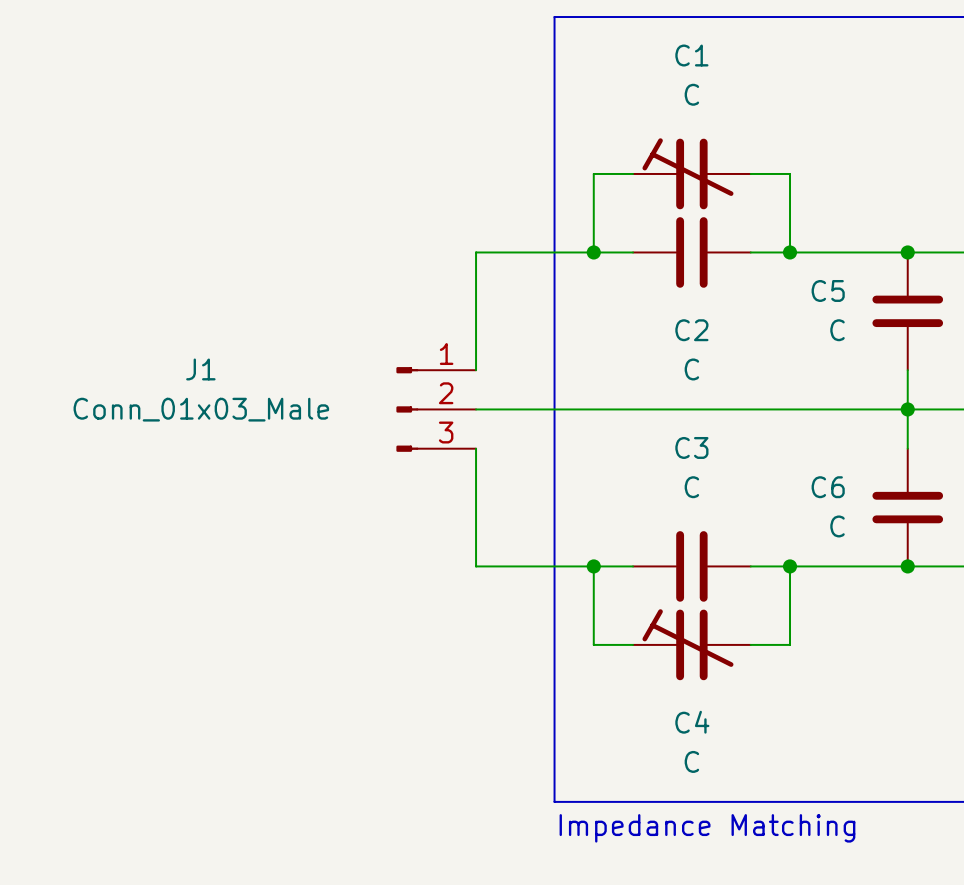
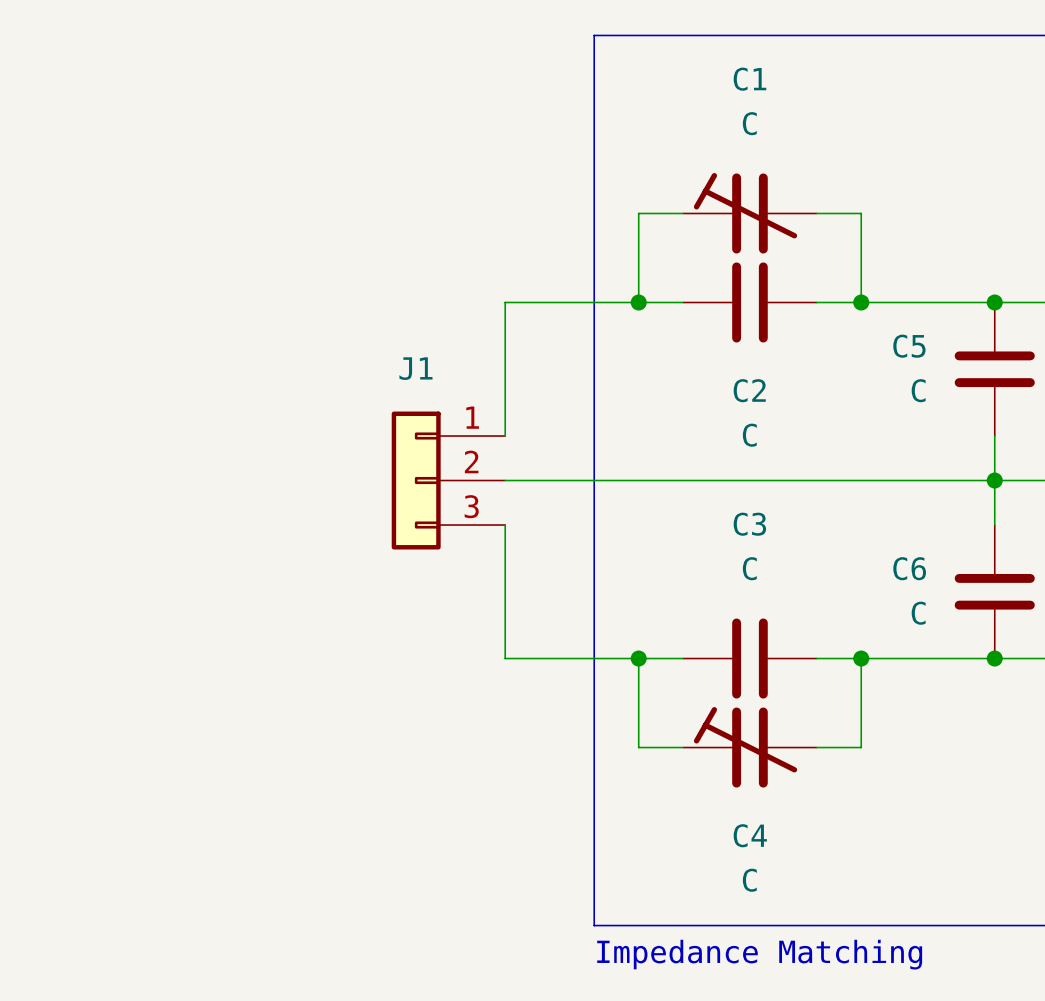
J1 symbol: [396, 367, 477, 452] -> [391, 411, 506, 550]
J1 name position: J1 (200, 369) -> J1 (415, 368)
J1 value: Conn_01x03_Male (201, 409) -> none

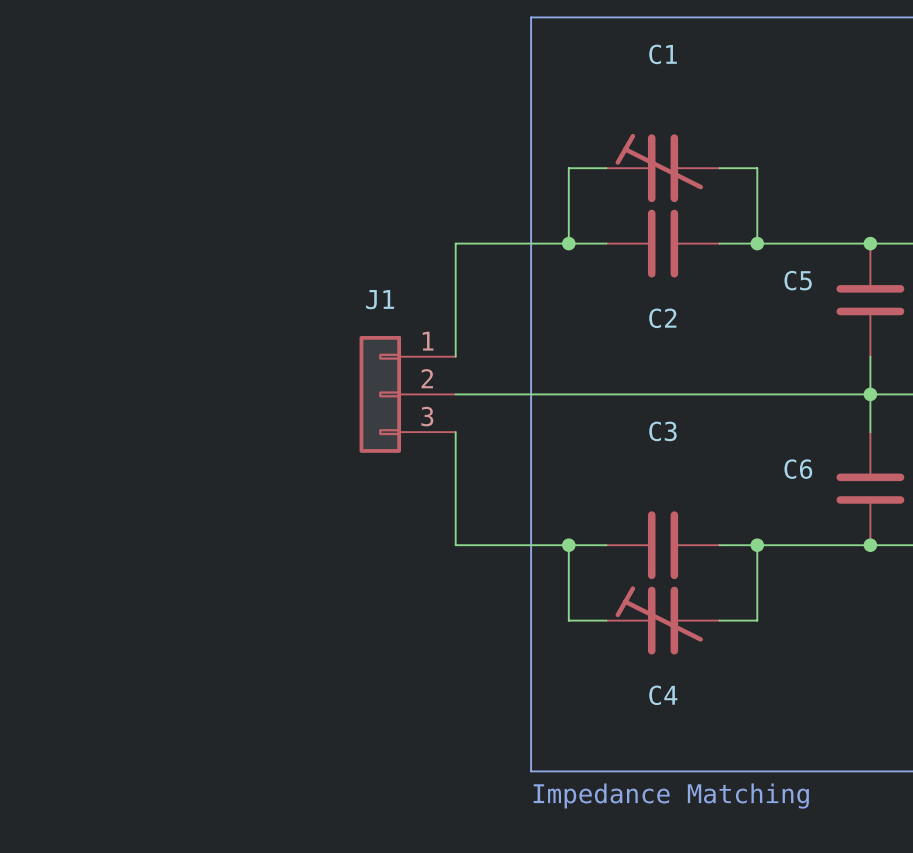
C1 value: C (749, 123) -> none
C5 value: C (918, 390) -> none
C2 value: C (749, 435) -> none
C3 value: C (749, 568) -> none
C6 value: C (918, 613) -> none
C4 value: C (749, 880) -> none

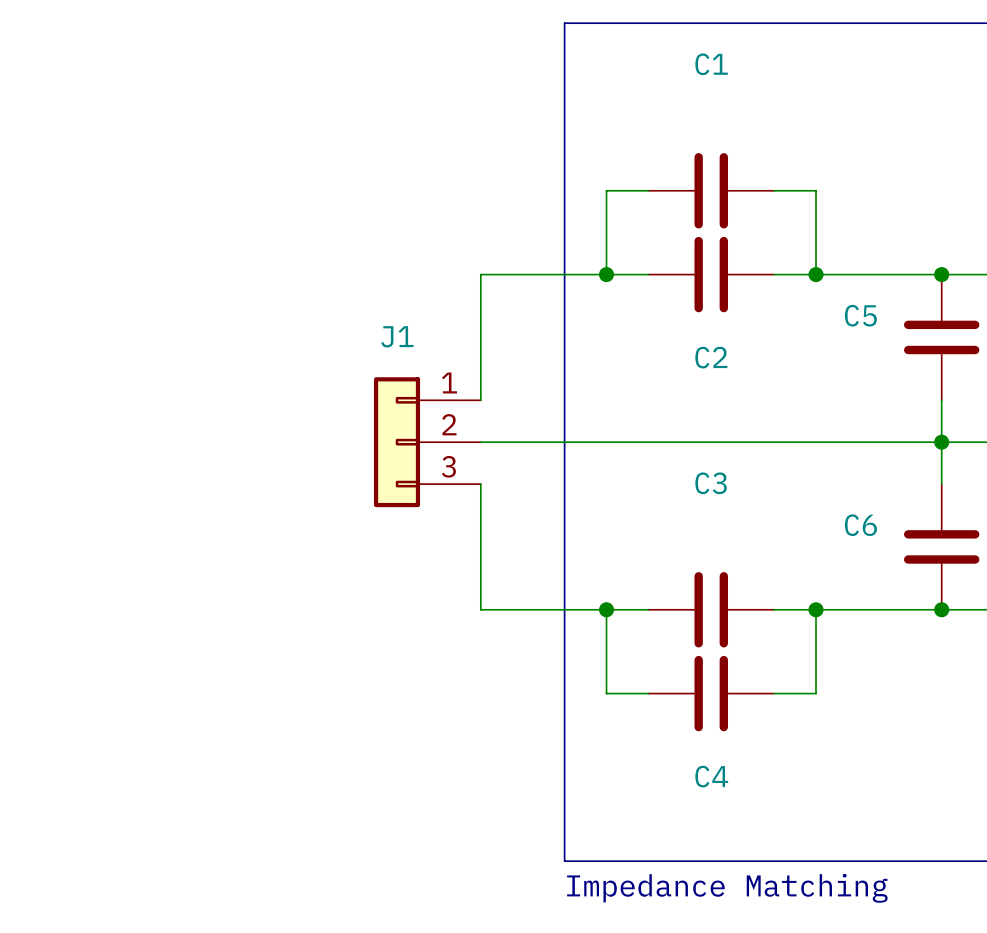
C1 symbol: [606, 133, 720, 203] -> [648, 153, 775, 229]
C4 symbol: [606, 586, 720, 655] -> [648, 655, 775, 732]

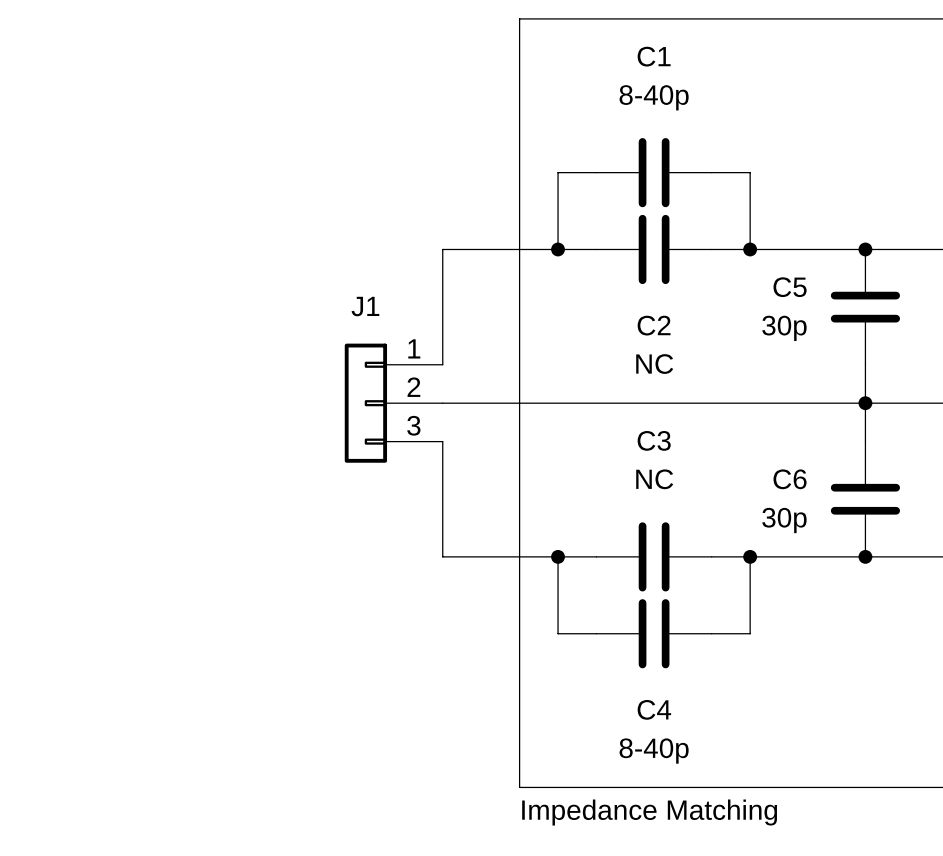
C1 value: none -> 8-40p (654, 97)
C5 value: none -> 30p (784, 328)
C2 value: none -> NC (654, 364)
C3 value: none -> NC (654, 479)
C6 value: none -> 30p (784, 520)
C4 value: none -> 8-40p (654, 751)

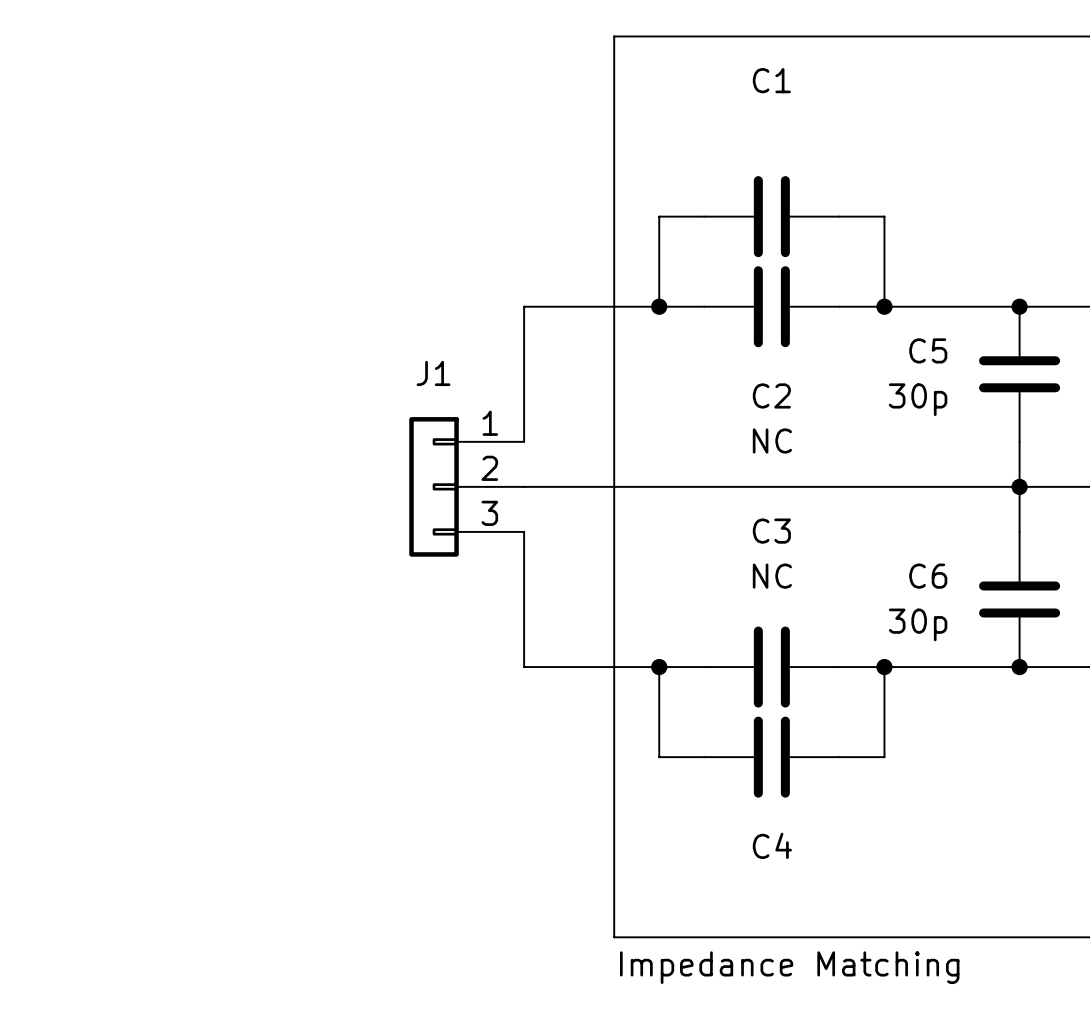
C1 value: 8-40p (654, 97) -> none
C4 value: 8-40p (654, 751) -> none

